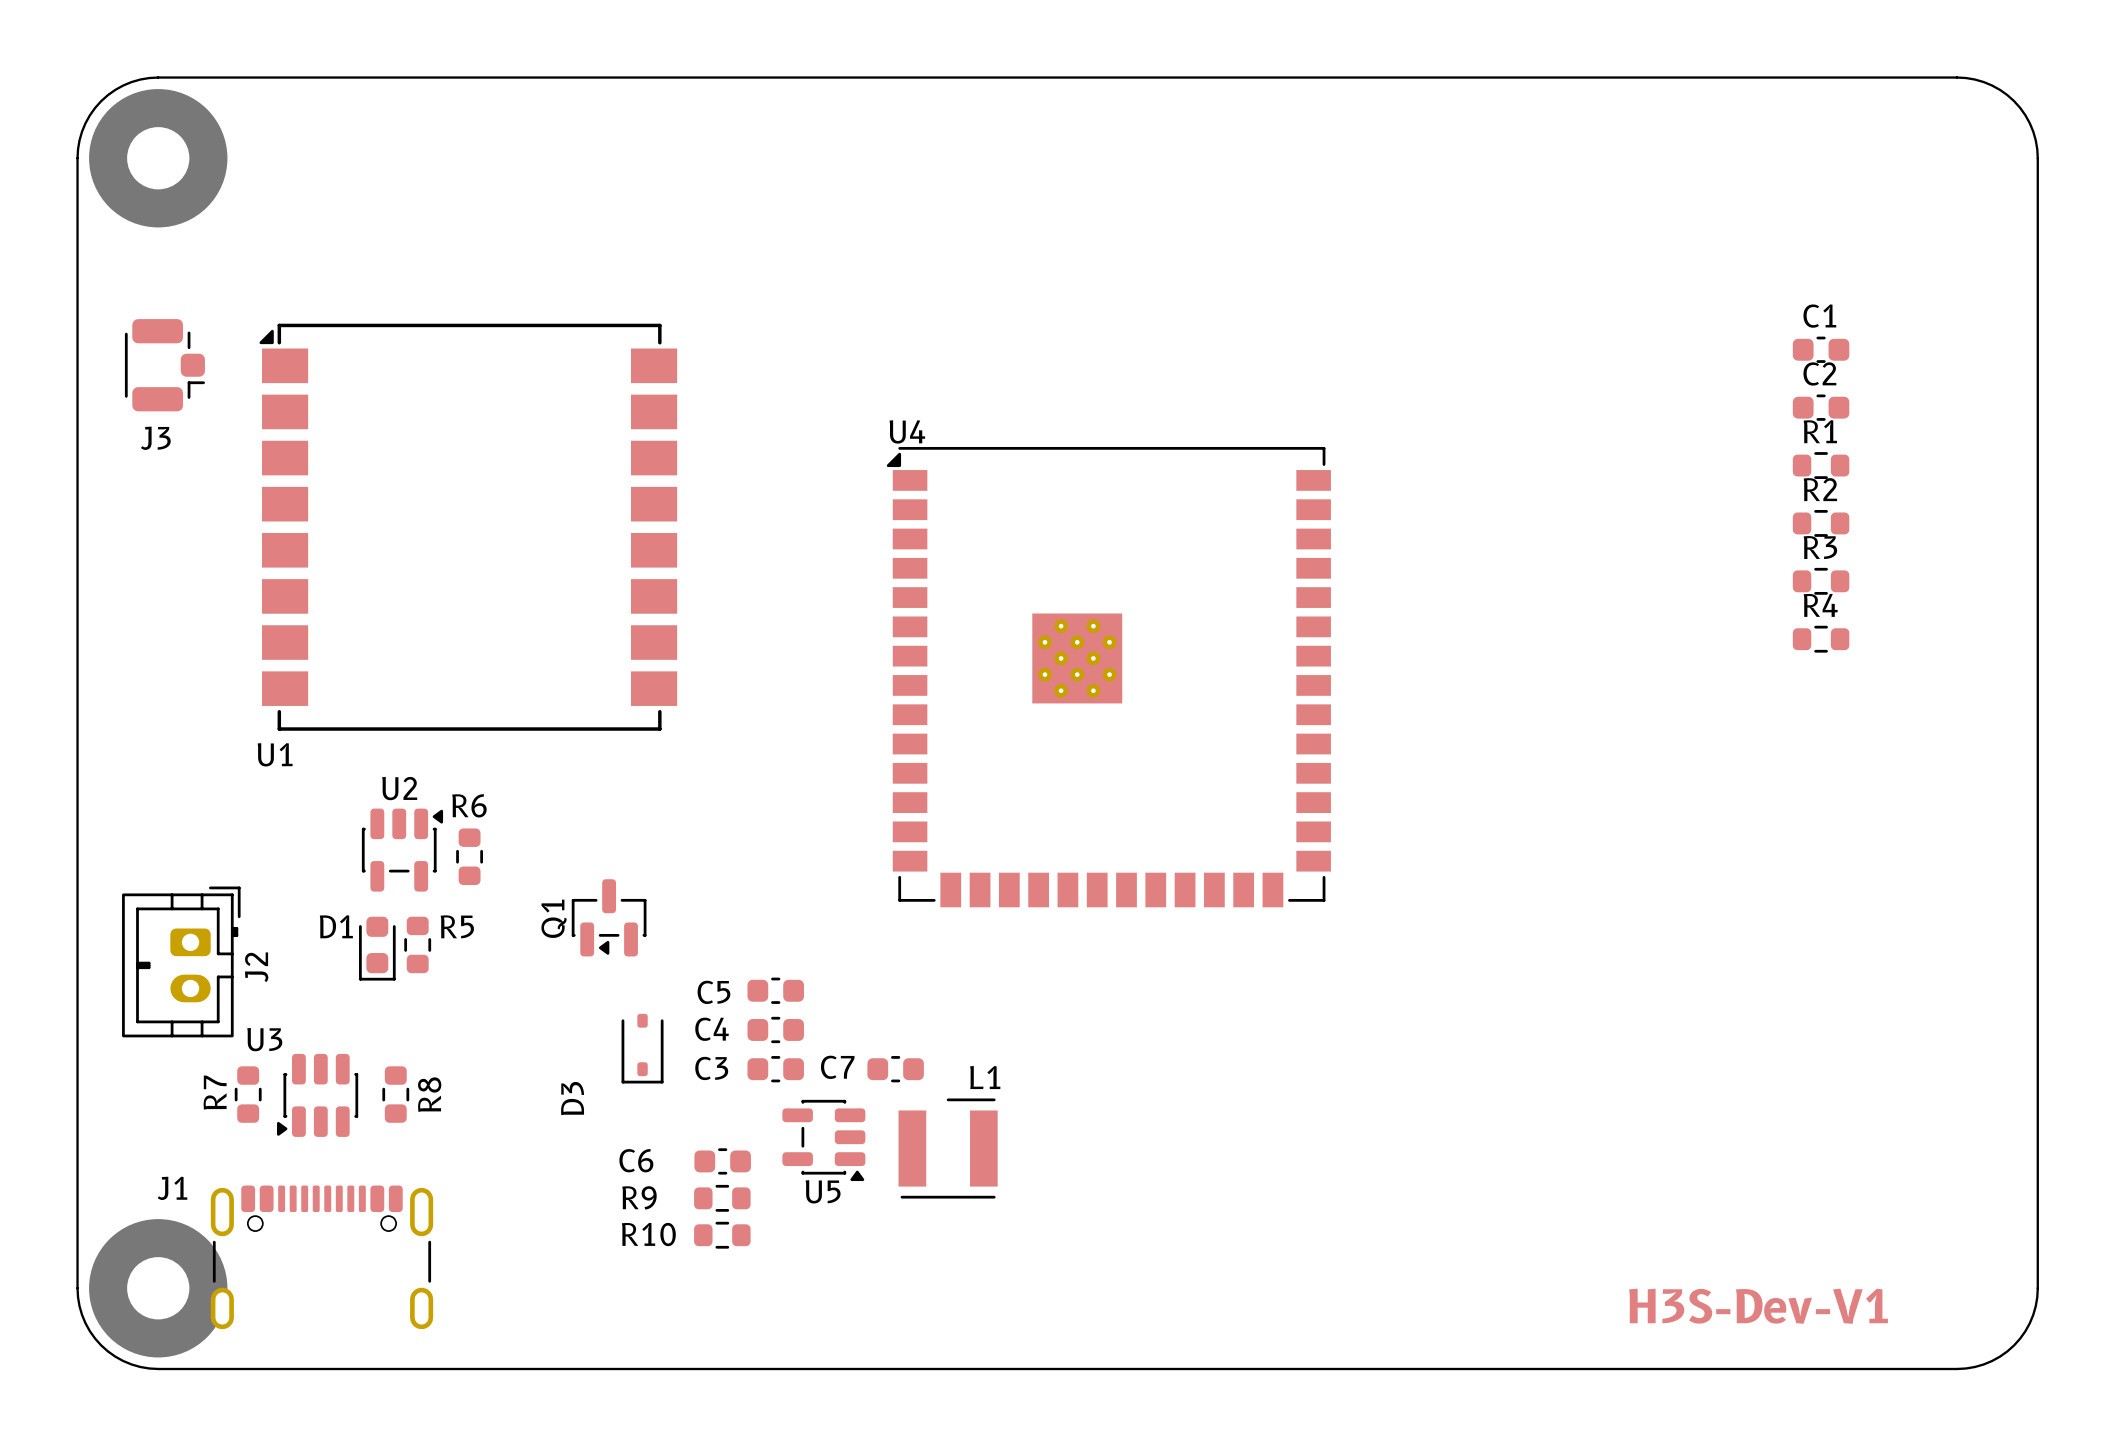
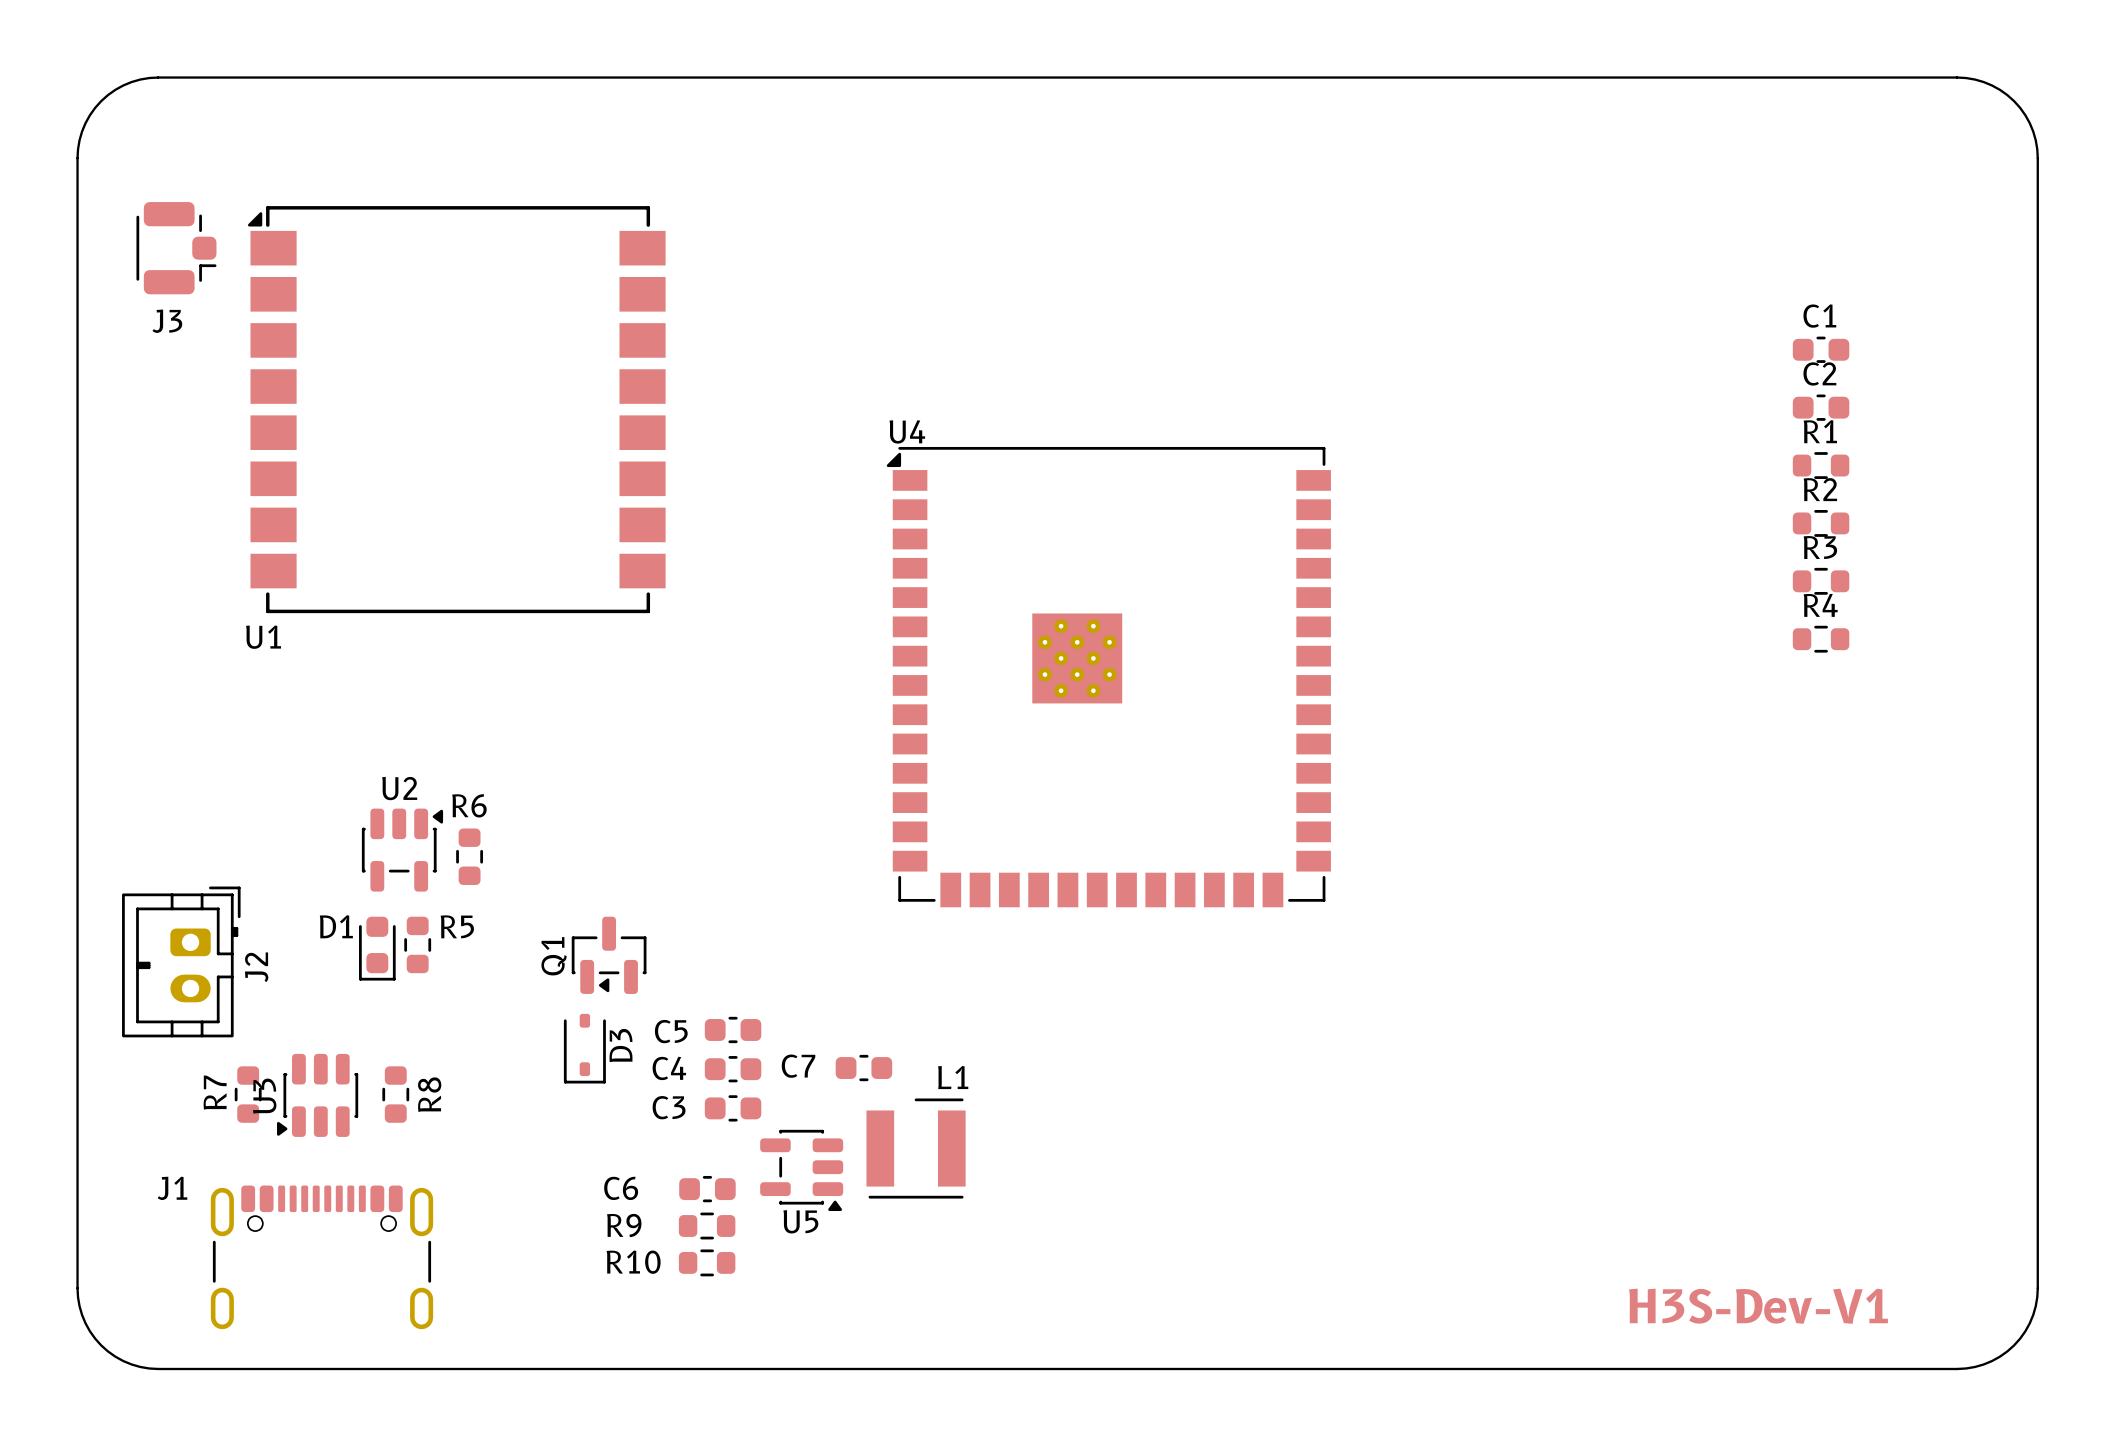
via: (158, 158) -> none
J3 position: (164, 365) -> (176, 248)
U1 position: (468, 527) -> (456, 409)
Q1 position: (609, 917) -> (609, 955)
C5 position: (775, 990) -> (733, 1029)
C4 position: (775, 1029) -> (733, 1069)
U3 name rotation: 0° (264, 1039) -> 90° counterclockwise (264, 1096)
D3 position: (642, 1048) -> (584, 1048)
C7 name position: C7 (837, 1067) -> C7 (798, 1066)
C3 position: (775, 1069) -> (733, 1108)
C7 position: (895, 1069) -> (863, 1068)
D3 name position: D3 (572, 1098) -> D3 (620, 1045)
U5 position: (823, 1140) -> (801, 1170)
L1 position: (948, 1148) -> (916, 1148)
C6 position: (722, 1161) -> (707, 1189)
R9 position: (722, 1198) -> (707, 1226)
R10 position: (722, 1235) -> (707, 1262)
via: (158, 1288) -> none

